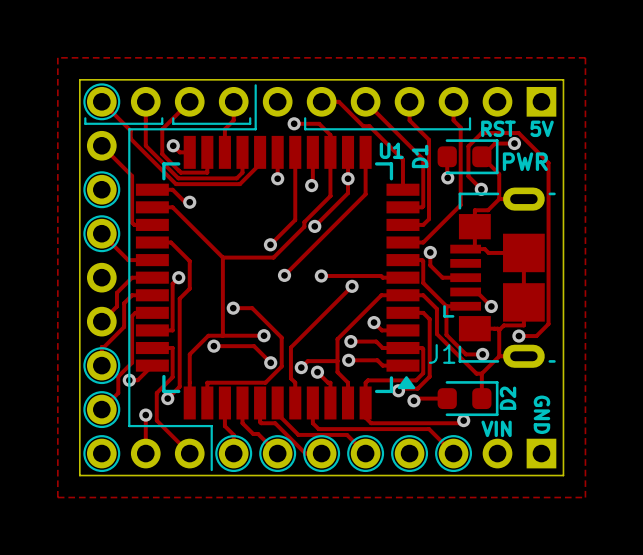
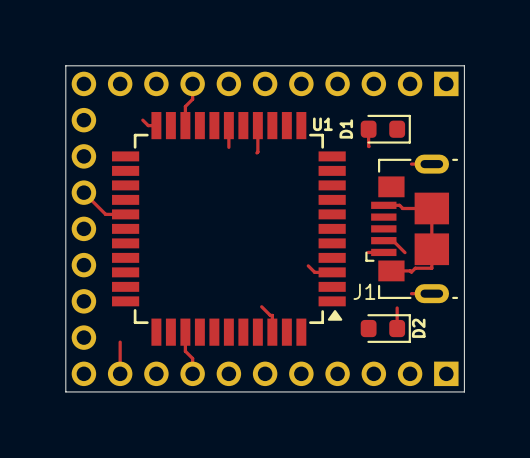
zone outline: (57, 57) (57, 497) (585, 497) (585, 57) (57, 57) -> none
drawing: [83, 83, 121, 121] -> none
line: (255, 85) (255, 129) (129, 129) (129, 426) (211, 426) (211, 470) -> none
track: (101, 101) (130, 130) (130, 138) (176, 184) (239, 184) (260, 164) (260, 152) -> none
track: (145, 101) (145, 145) (178, 178) (236, 178) (242, 172) (242, 152) -> none
track: (189, 101) (162, 129) (162, 154) (180, 172) (207, 172) (207, 152) -> none
track: (321, 101) (338, 101) (363, 126) (369, 126) (402, 159) (402, 189) -> none
track: (365, 101) (423, 159) (423, 206) (402, 207) -> none
track: (409, 101) (409, 120) (429, 139) (429, 219) (423, 224) (402, 224) -> none
track: (453, 101) (453, 120) (460, 127) (460, 205) (423, 242) (402, 242) -> none
line: (85, 118) (85, 123) (162, 123) (162, 118) -> none
line: (173, 118) (173, 123) (250, 123) (250, 118) -> none
line: (305, 118) (305, 129) (470, 129) (470, 118) -> none
track: (294, 123) (319, 123) (330, 135) (330, 196) (304, 222) (304, 226) (273, 257) (222, 257) -> none
via: (294, 123) -> none
text: RST (498, 128) -> none
text: 5V (542, 128) -> none
track: (514, 143) (495, 143) (481, 156) (499, 174) (499, 199) (488, 210) (474, 210) (475, 249) -> none
via: (514, 143) -> none
track: (101, 145) (132, 176) (132, 222) (134, 224) (152, 224) -> none
via: (173, 145) -> none
track: (295, 152) (295, 220) (270, 244) -> none
track: (348, 152) (348, 193) (314, 226) -> none
track: (365, 152) (365, 194) (284, 275) -> none
text: PWR (525, 161) -> none
drawing: [83, 171, 121, 253] -> none
via: (447, 177) -> none
via: (277, 178) -> none
via: (348, 178) -> none
via: (311, 185) -> none
track: (152, 189) (172, 189) (185, 202) (189, 202) -> none
track: (481, 189) (468, 176) (468, 146) (481, 133) (518, 133) (548, 162) (548, 324) (536, 336) (518, 336) -> none
via: (481, 189) -> none
via: (189, 202) -> none
track: (152, 207) (172, 207) (222, 257) -> none
via: (314, 226) -> none
track: (152, 242) (171, 242) (189, 261) (189, 288) (179, 298) (179, 386) (167, 398) -> none
via: (270, 244) -> none
track: (430, 252) (430, 265) (442, 277) (465, 277) -> none
via: (430, 252) -> none
track: (222, 257) (222, 335) -> none
track: (402, 260) (423, 261) (423, 283) (446, 306) (446, 334) (466, 354) (482, 354) -> none
via: (284, 275) -> none
track: (321, 275) (402, 277) -> none
via: (321, 275) -> none
track: (152, 277) (132, 277) (116, 292) (116, 306) (101, 321) -> none
track: (178, 277) (172, 283) (172, 330) (152, 330) -> none
via: (178, 277) -> none
track: (352, 286) (290, 347) (290, 378) (295, 382) (295, 402) -> none
via: (352, 286) -> none
track: (152, 295) (132, 295) (124, 303) (124, 327) (104, 347) (101, 347) (101, 365) -> none
via: (491, 306) -> none
track: (233, 308) (252, 308) (281, 337) (281, 366) (265, 382) (207, 382) (207, 402) -> none
via: (233, 308) -> none
track: (152, 312) (135, 312) (132, 316) (132, 362) (118, 376) (118, 393) (101, 409) -> none
track: (402, 312) (423, 312) (429, 319) (429, 376) (417, 388) (400, 388) (398, 390) -> none
via: (374, 322) -> none
track: (499, 330) (499, 356) (481, 373) (476, 373) (436, 334) (436, 308) (423, 295) (381, 295) (337, 339) (337, 372) (348, 382) (348, 402) -> none
track: (264, 335) (208, 335) (189, 354) (189, 402) -> none
via: (264, 335) -> none
via: (518, 336) -> none
track: (350, 341) (376, 341) (382, 348) (423, 349) (423, 373) (416, 380) (367, 380) (365, 382) (365, 417) (371, 423) (461, 423) (463, 420) -> none
via: (350, 341) -> none
track: (213, 346) (254, 346) (270, 362) -> none
via: (213, 346) -> none
drawing: [83, 347, 121, 473] -> none
track: (152, 348) (172, 348) (172, 377) (156, 393) (156, 420) (189, 453) -> none
via: (482, 354) -> none
track: (348, 360) (377, 360) (382, 365) (402, 365) -> none
via: (348, 360) -> none
track: (337, 361) (307, 361) (301, 367) -> none
via: (270, 362) -> none
track: (152, 365) (137, 380) (129, 380) -> none
via: (301, 367) -> none
via: (317, 372) -> none
via: (129, 380) -> none
via: (398, 390) -> none
via: (167, 398) -> none
track: (447, 398) (416, 398) (413, 400) -> none
via: (413, 400) -> none
track: (242, 402) (242, 423) (253, 434) (258, 434) (277, 453) -> none
track: (260, 402) (261, 423) (275, 423) (305, 453) (321, 453) -> none
track: (277, 402) (277, 414) (298, 434) (347, 434) (365, 453) -> none
track: (312, 402) (312, 423) (318, 429) (429, 429) (453, 453) -> none
text: GND (541, 414) -> none
via: (145, 415) -> none
via: (463, 420) -> none
text: VIN (496, 428) -> none
drawing: [215, 435, 473, 473] -> none

